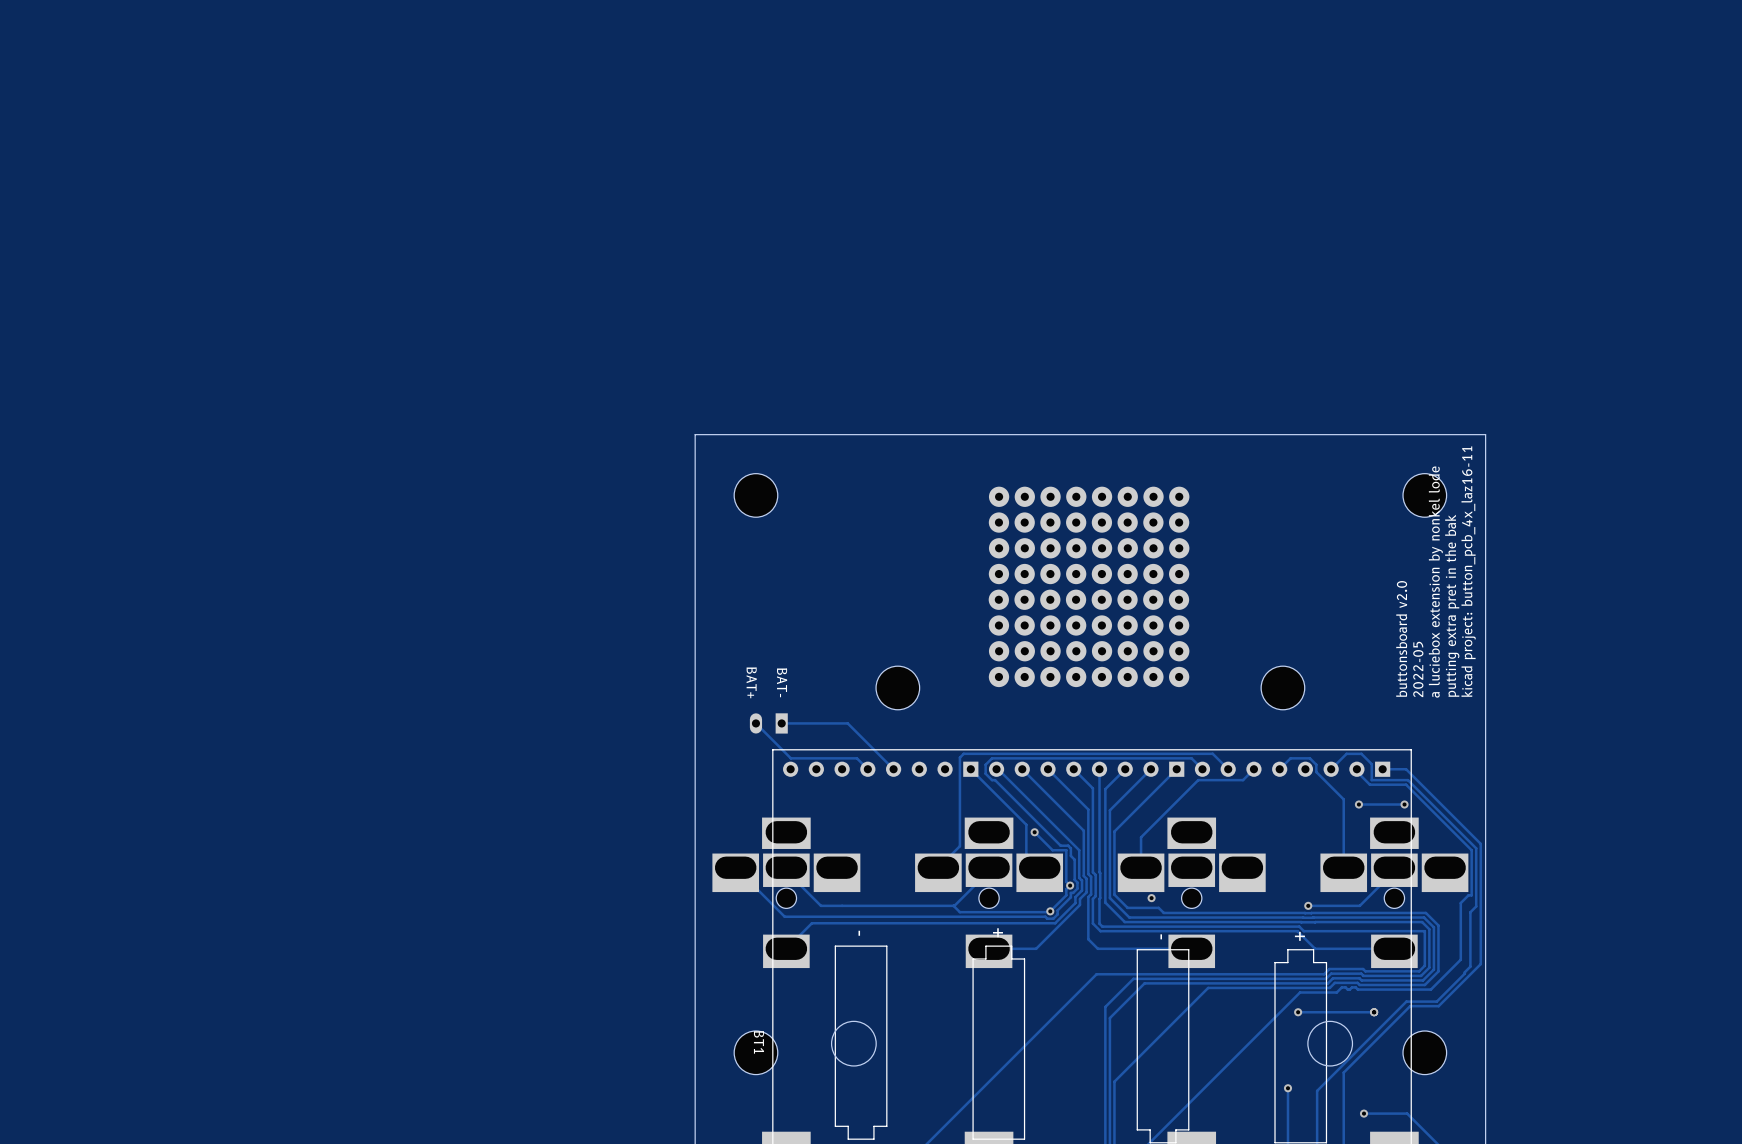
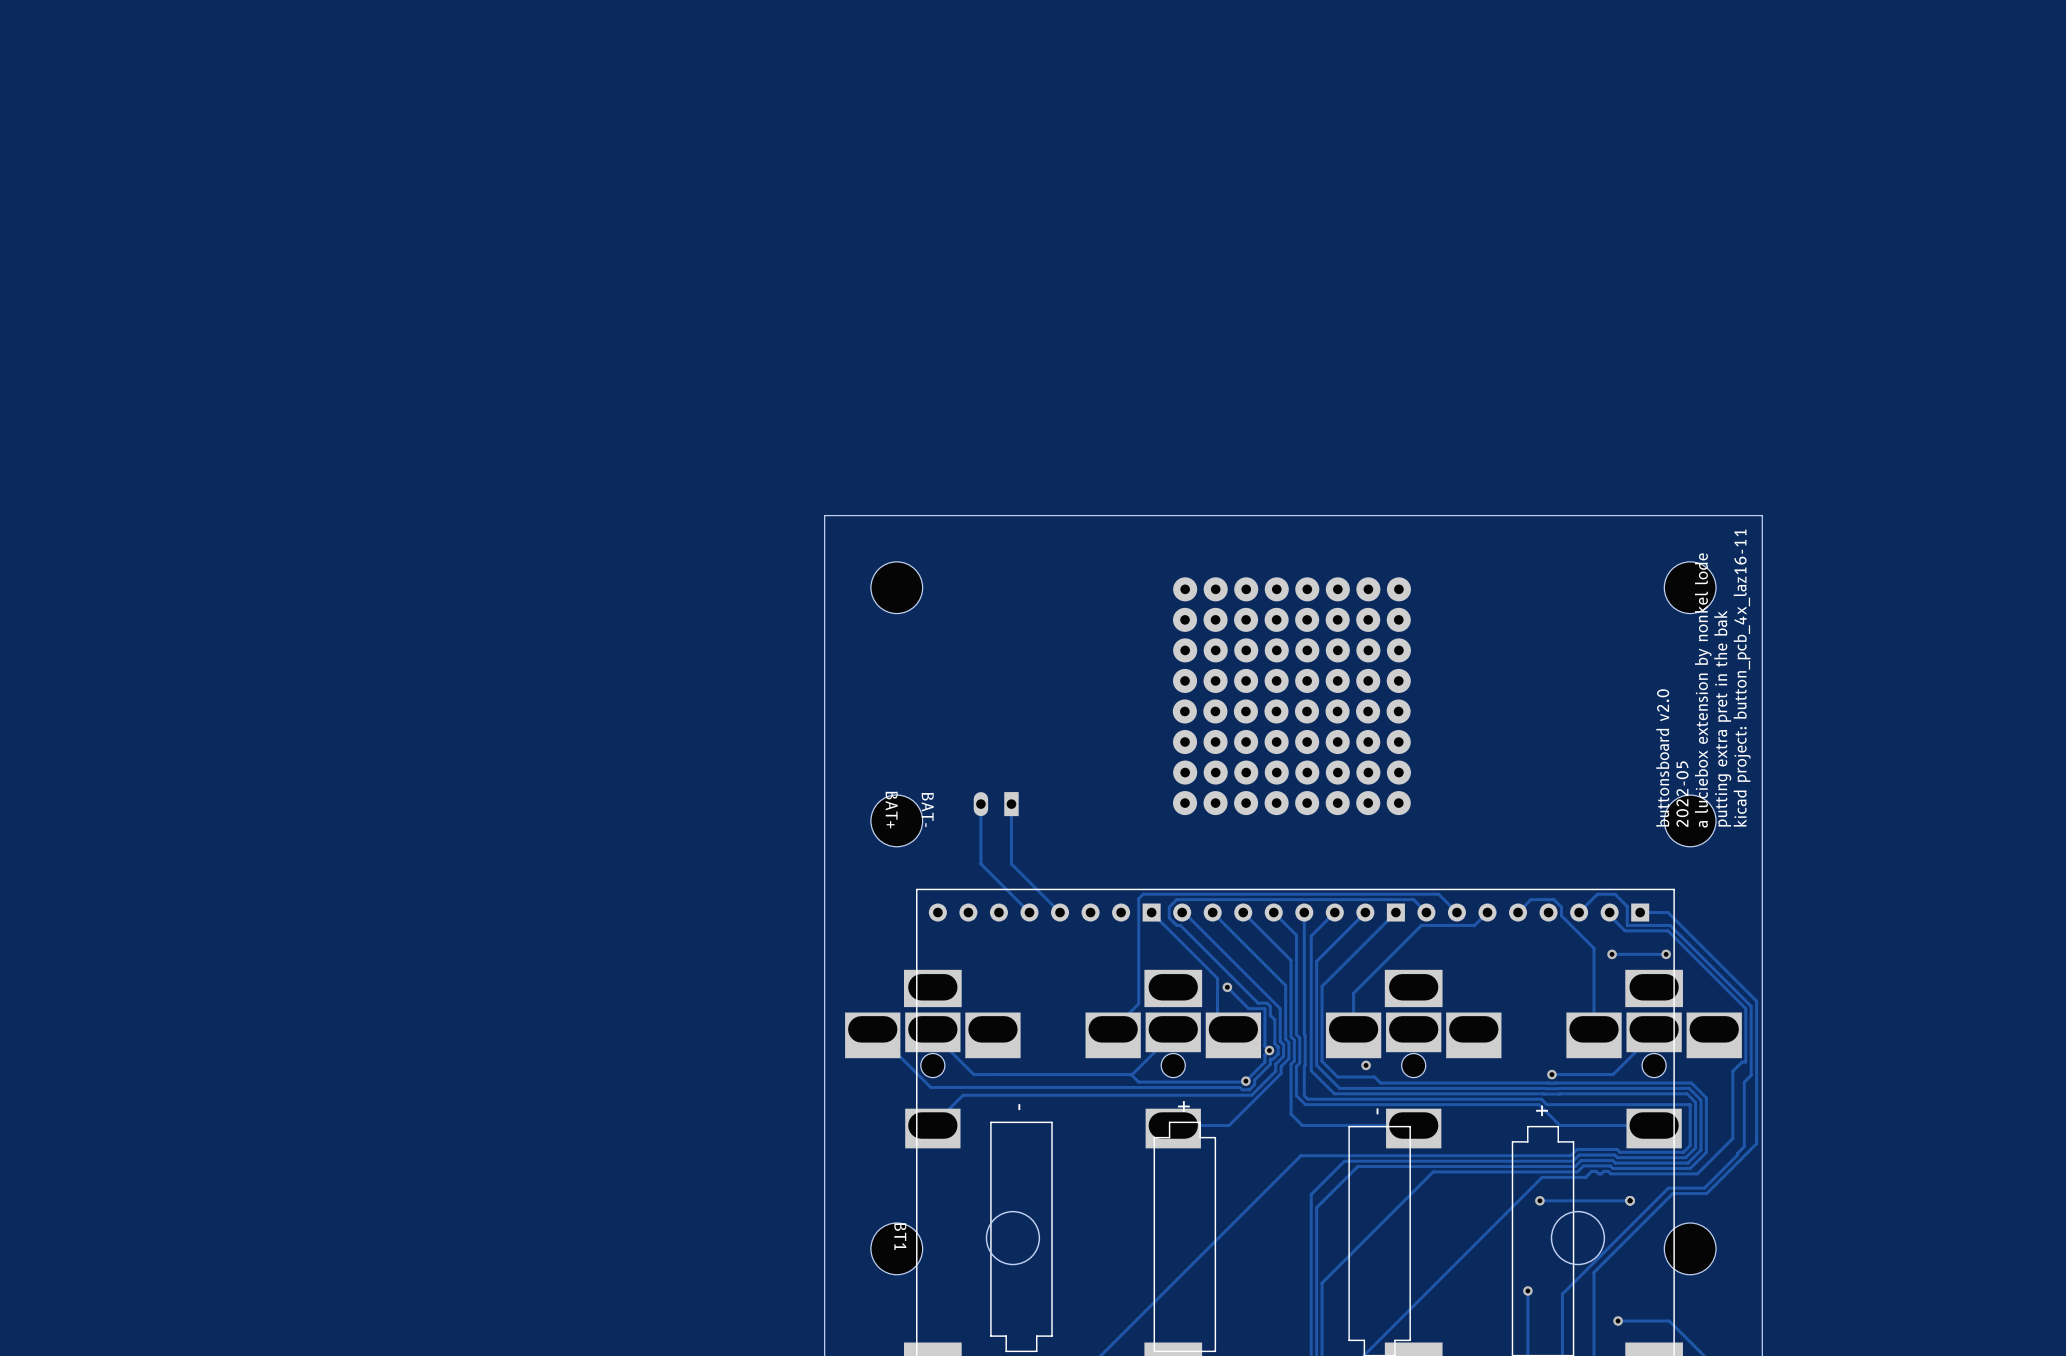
part position: (897, 687) -> (896, 820)
part position: (1282, 687) -> (1690, 820)
track: (755, 723) (790, 758) (856, 758) -> (980, 804) (980, 863) (1016, 899)
part position: (768, 723) -> (996, 804)
track: (781, 723) (847, 723) (852, 728) -> (1011, 804) (1011, 863)

